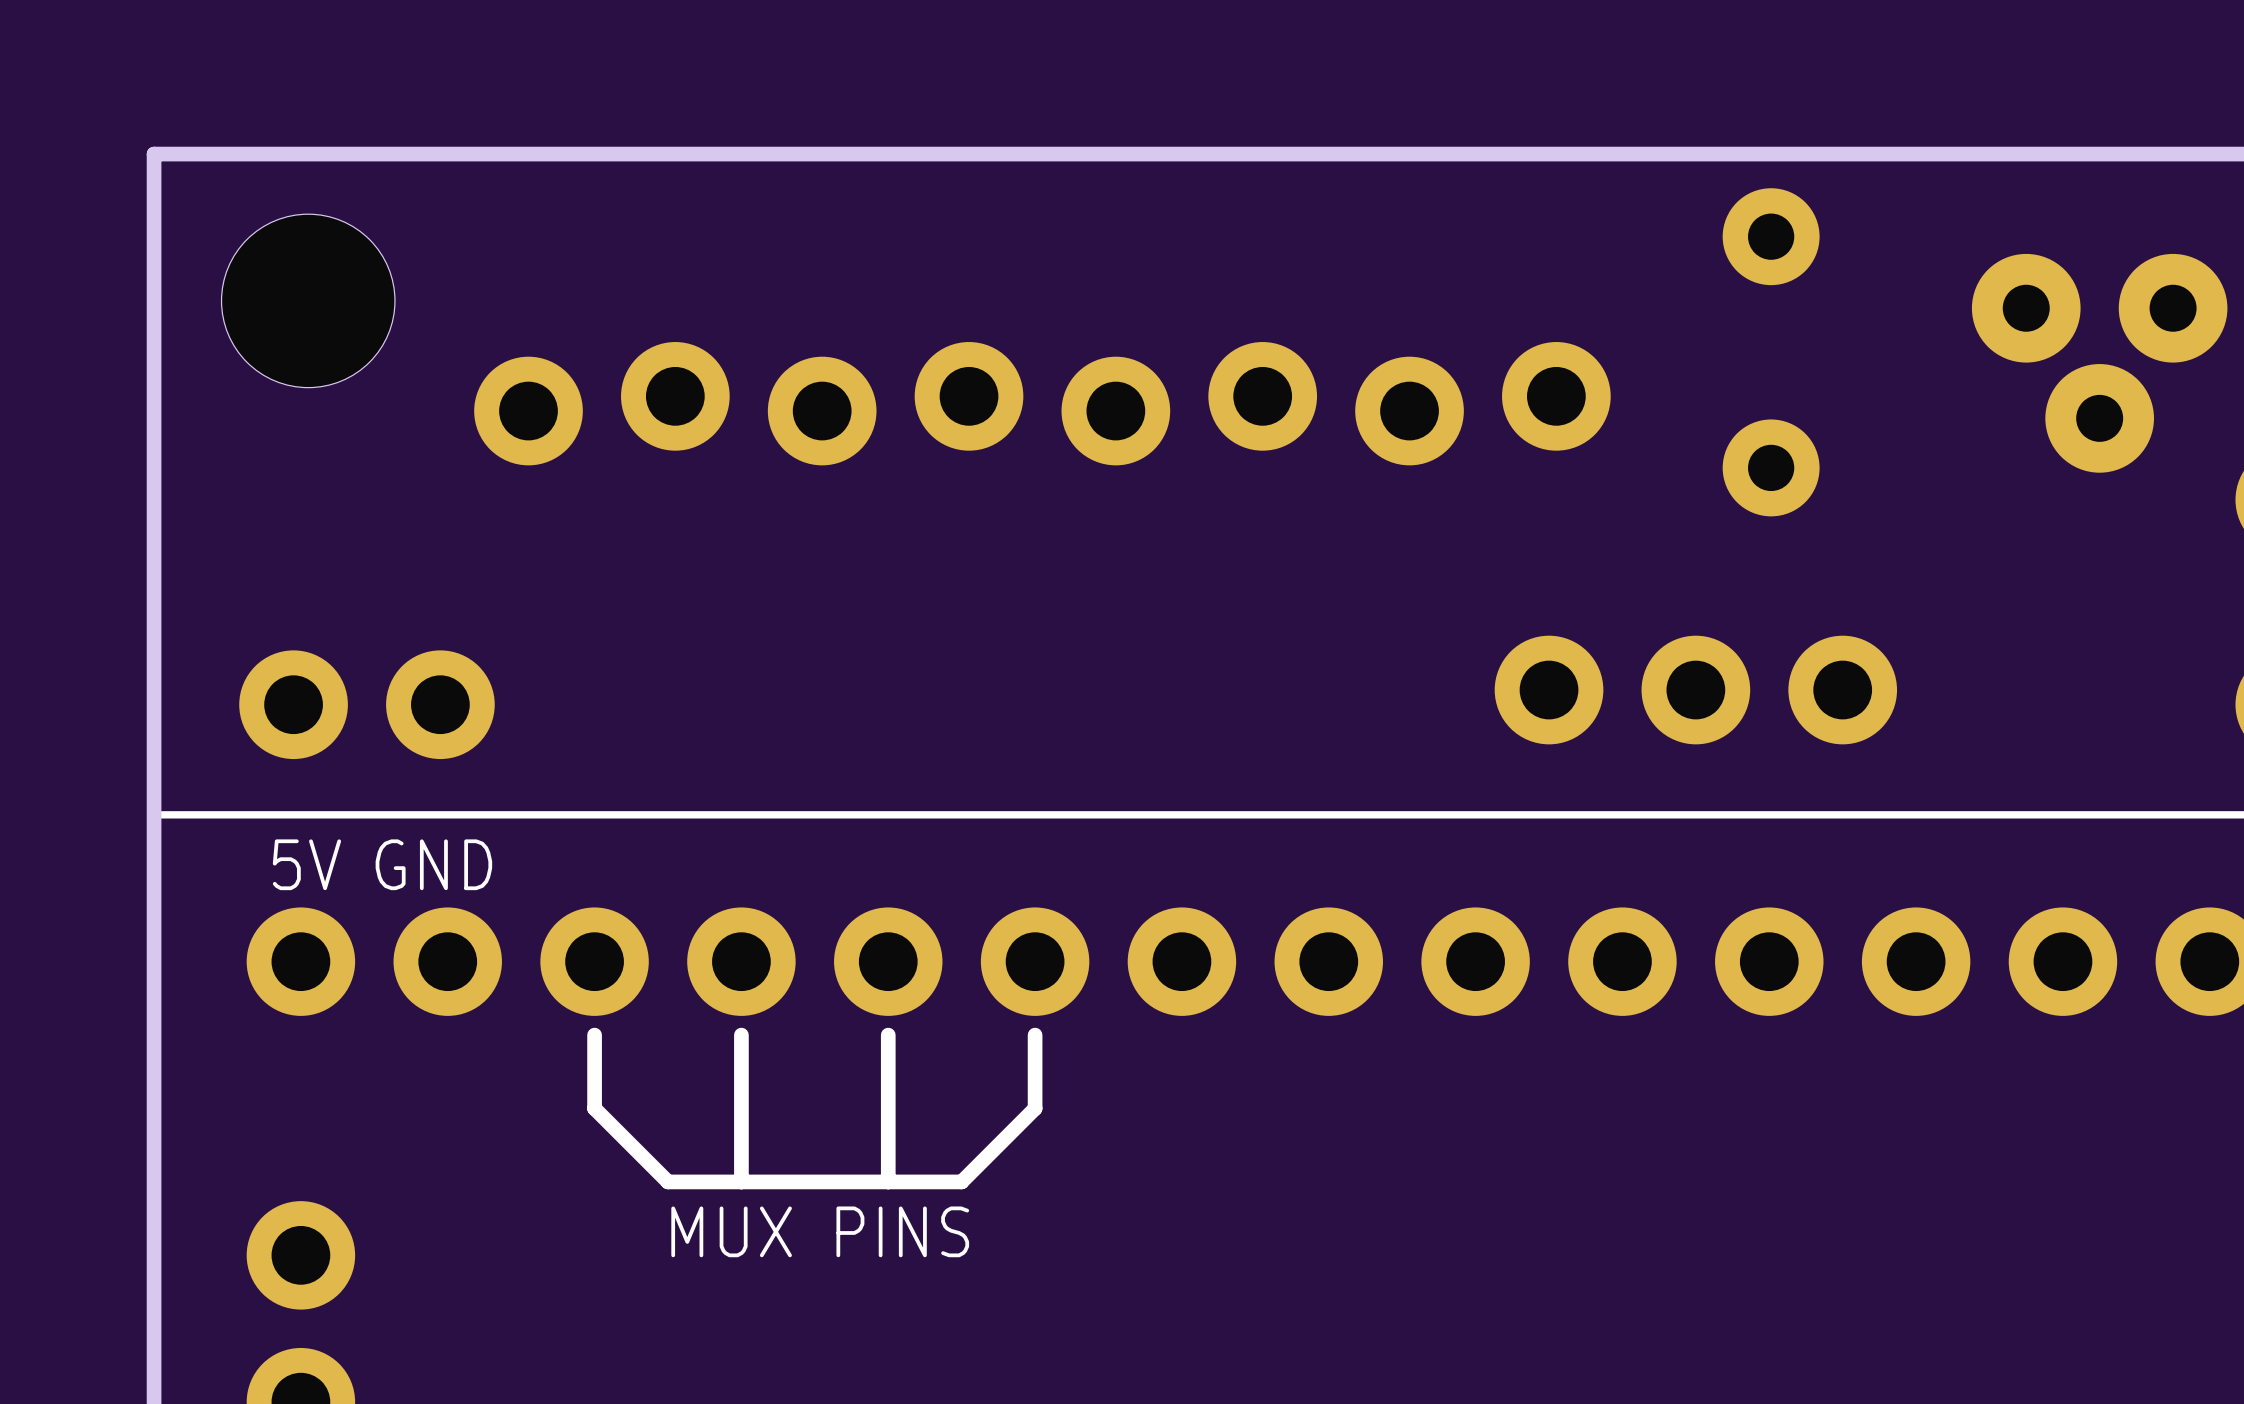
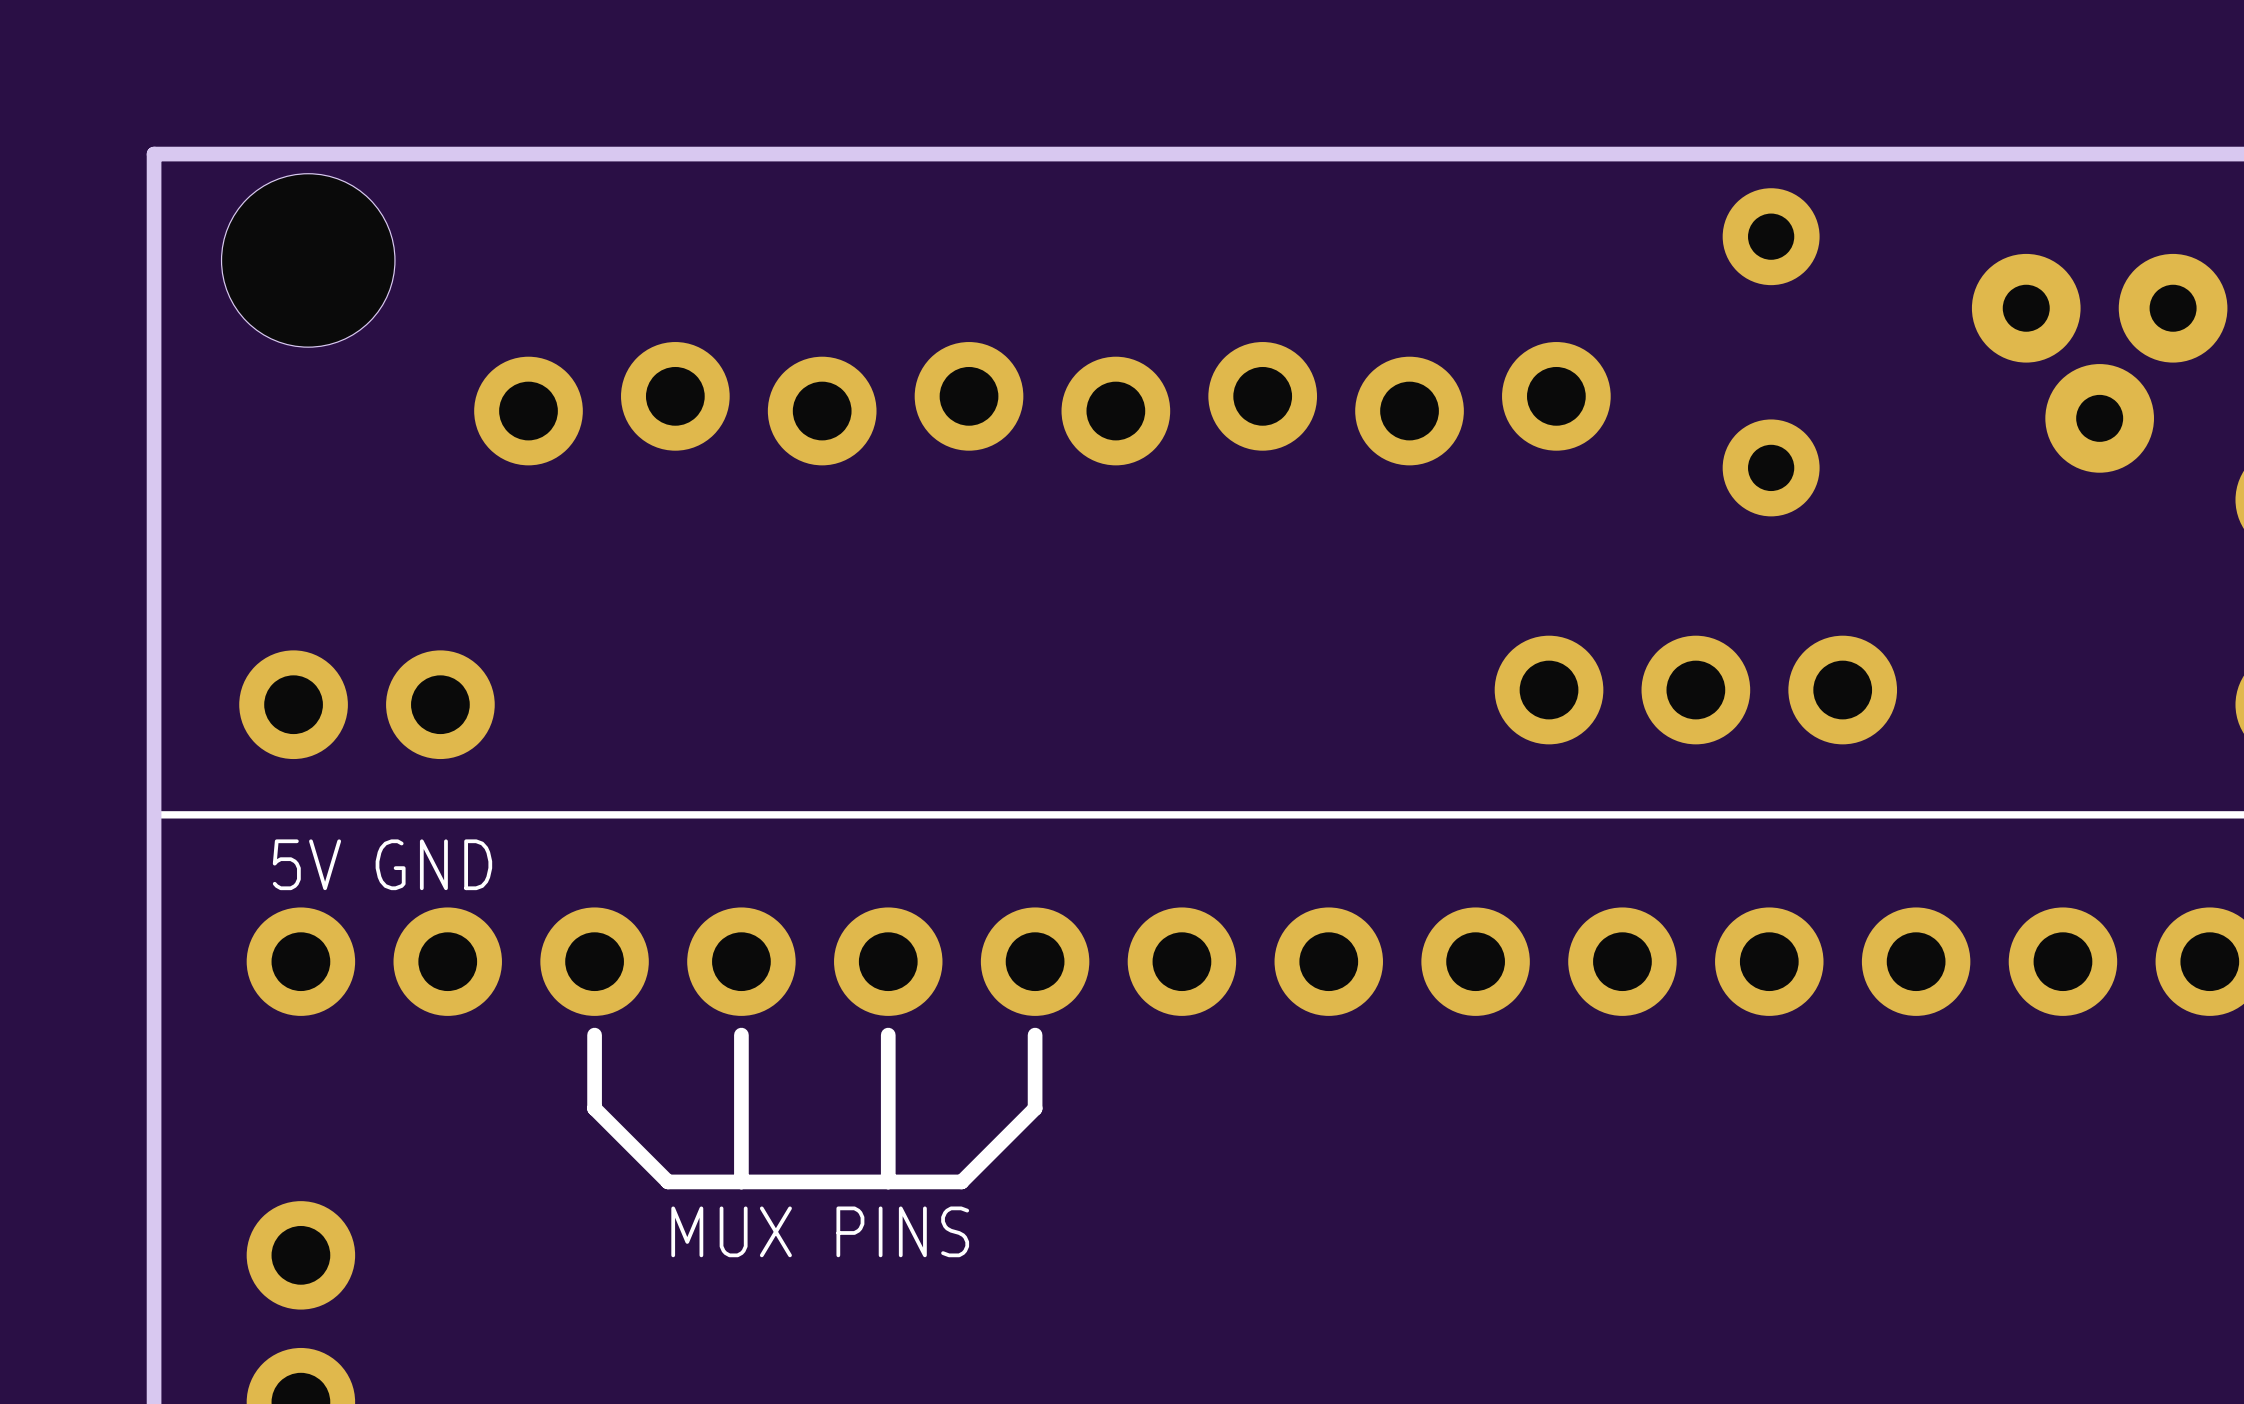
hole position: (308, 300) -> (308, 260)

